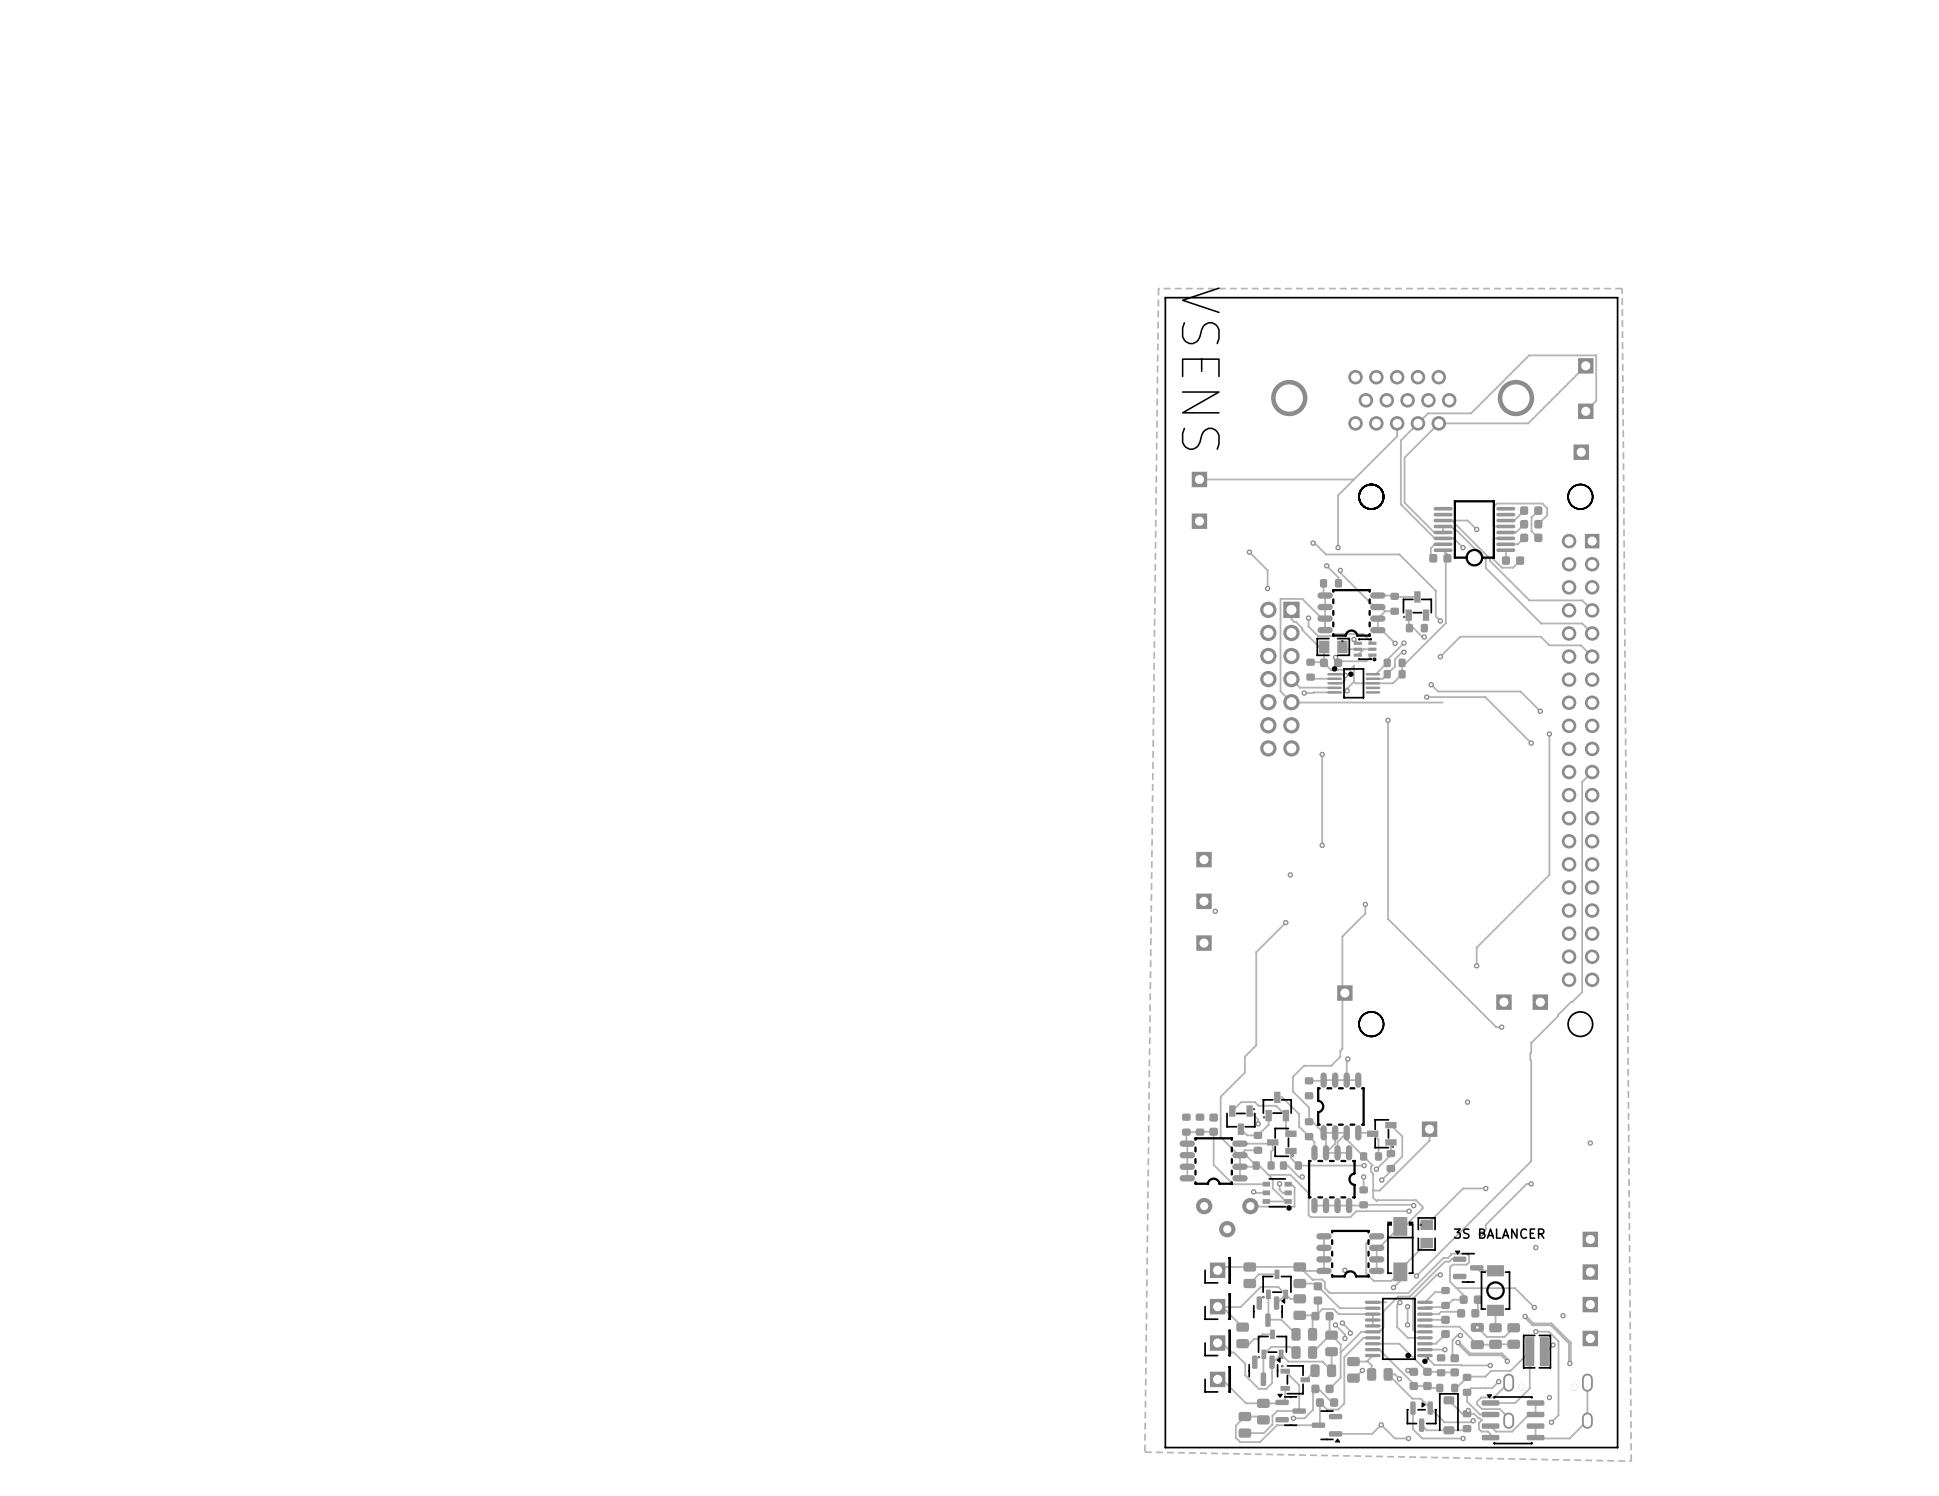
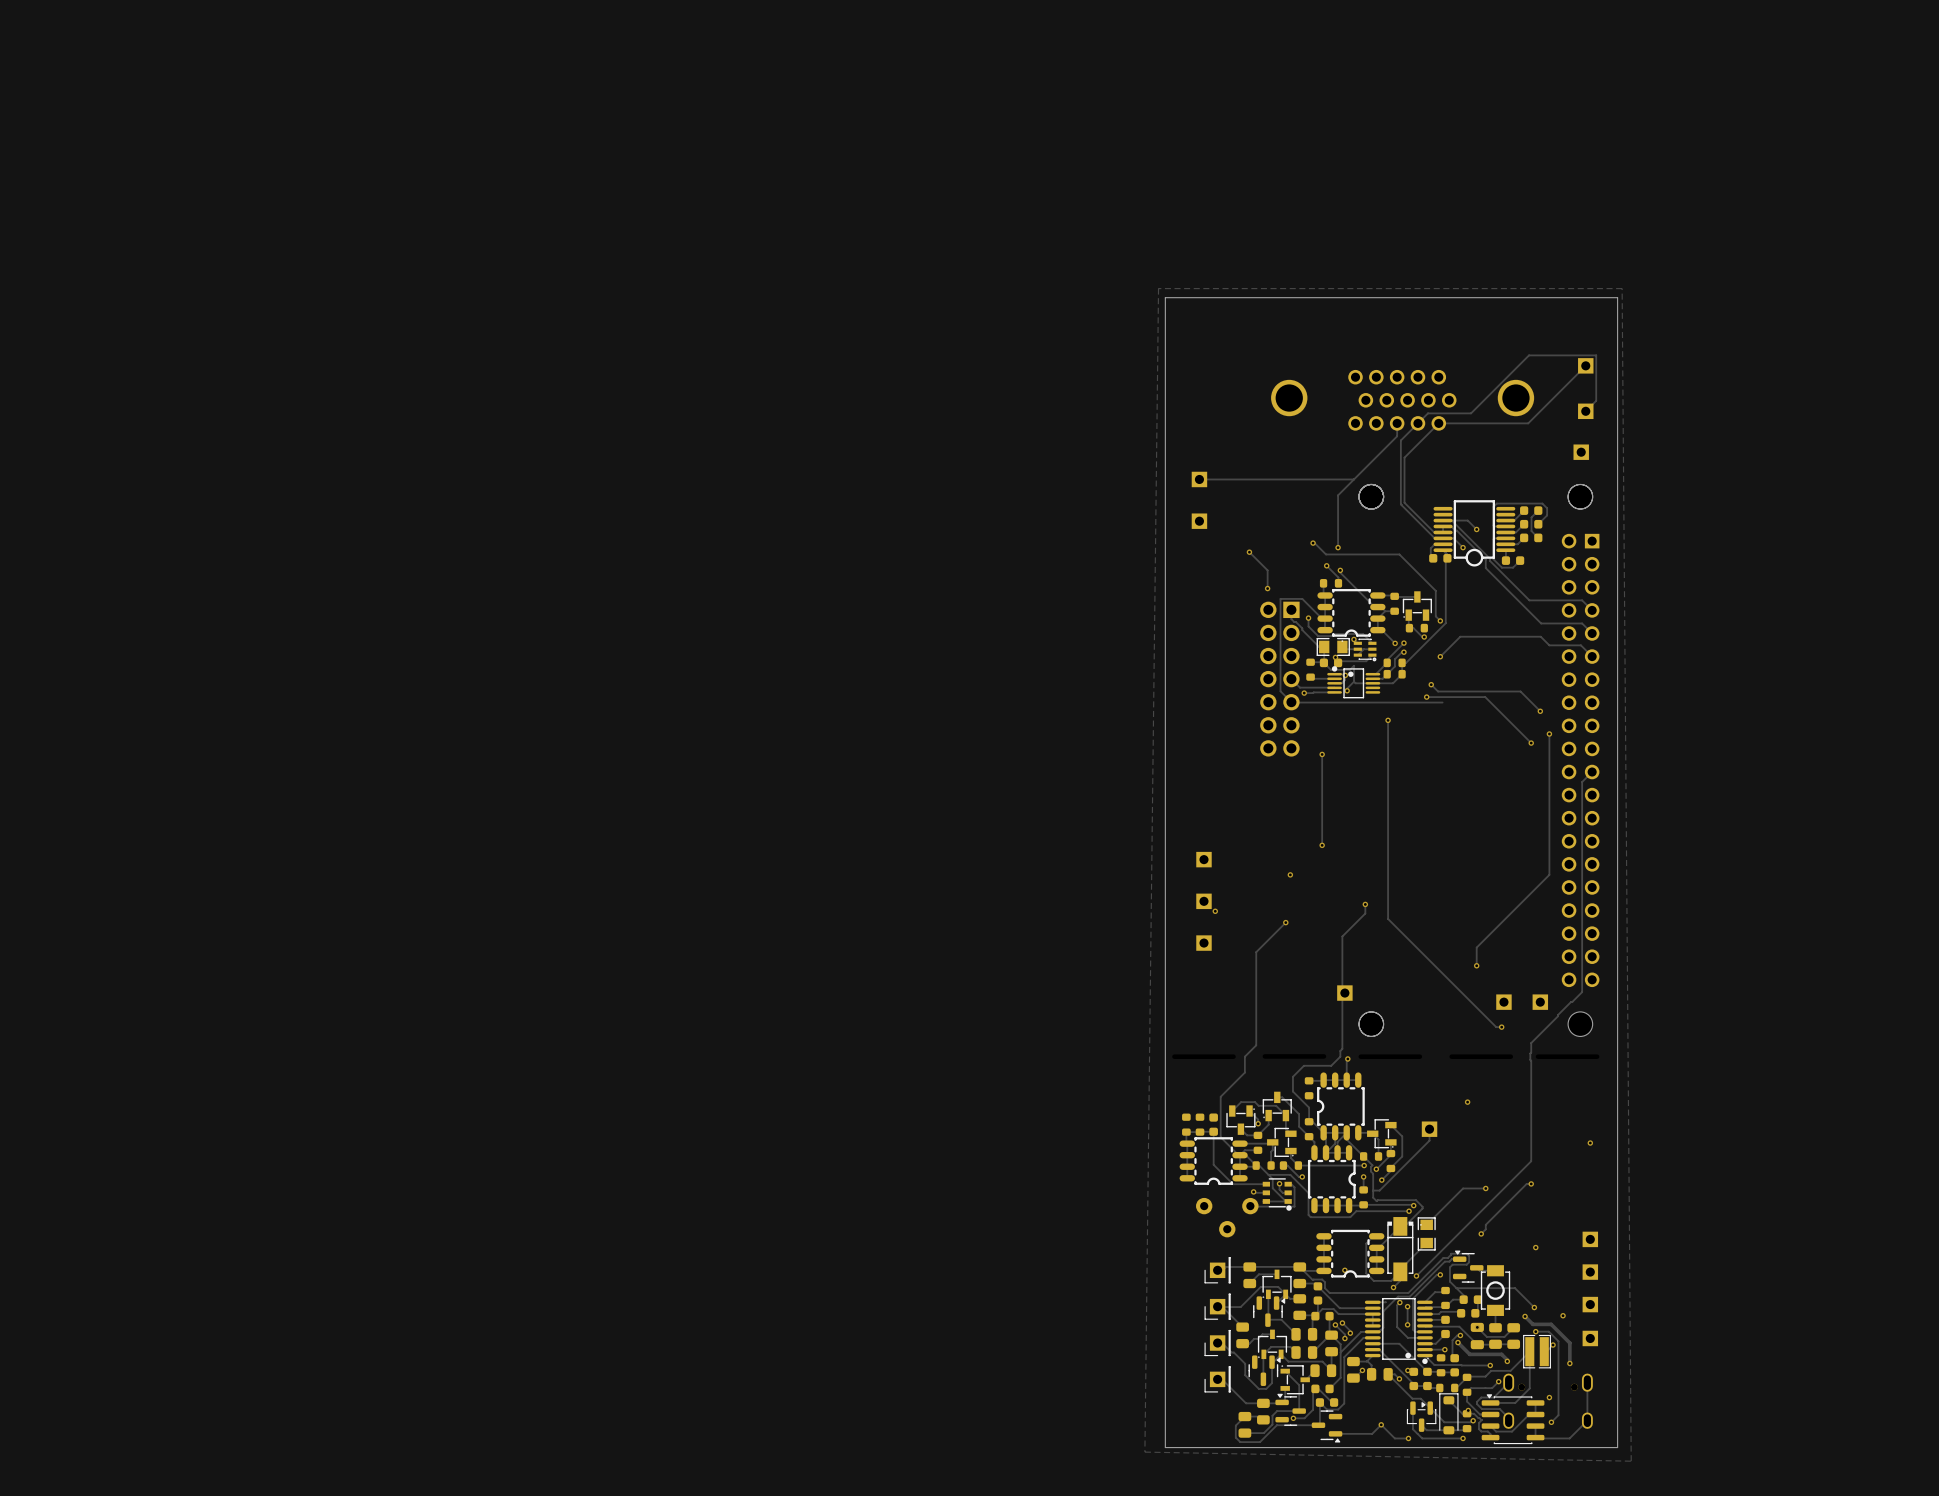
text: VSENS (1200, 368) -> none
text: 3S BALANCER (1499, 1233) -> none

